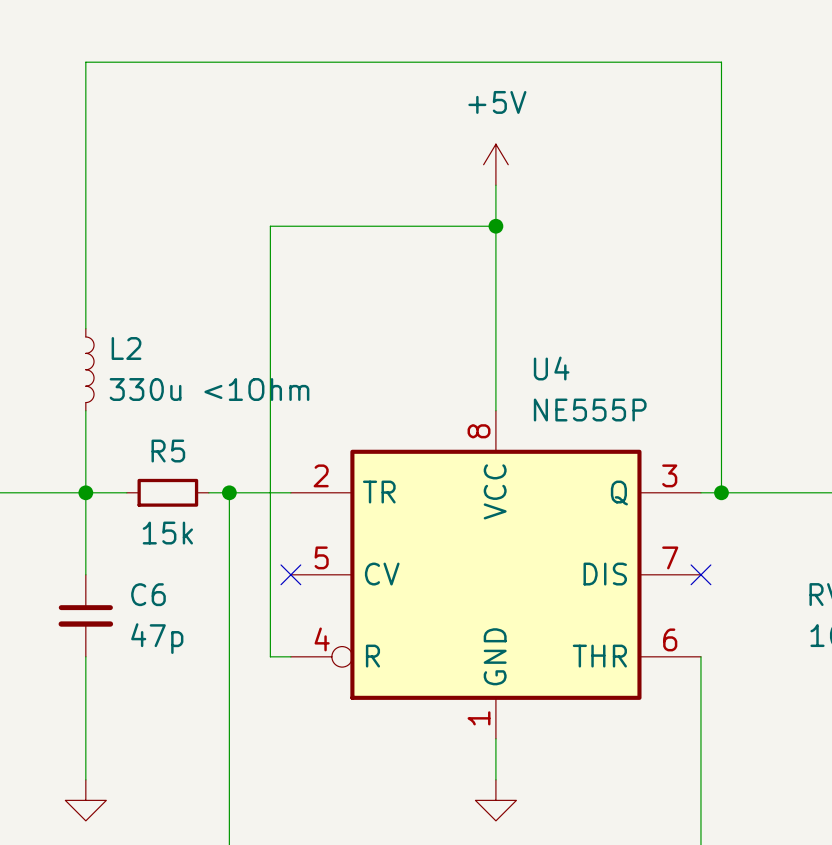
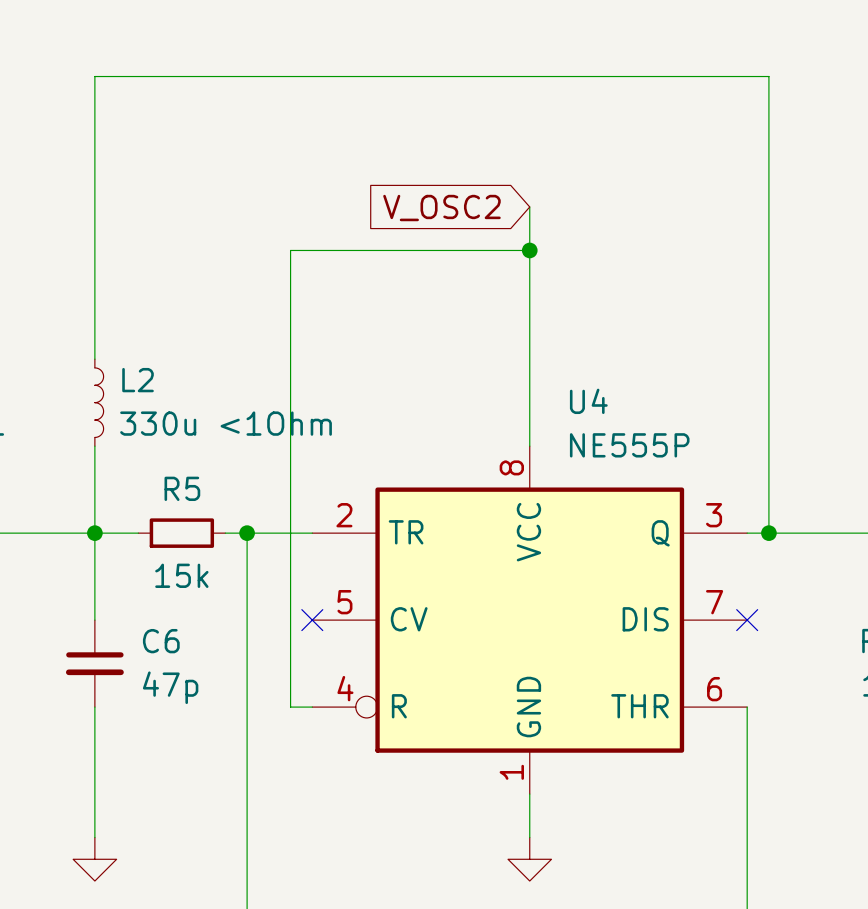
power symbol: +5V (495, 164) -> none
global label: none -> V_OSC2 (441, 208)

